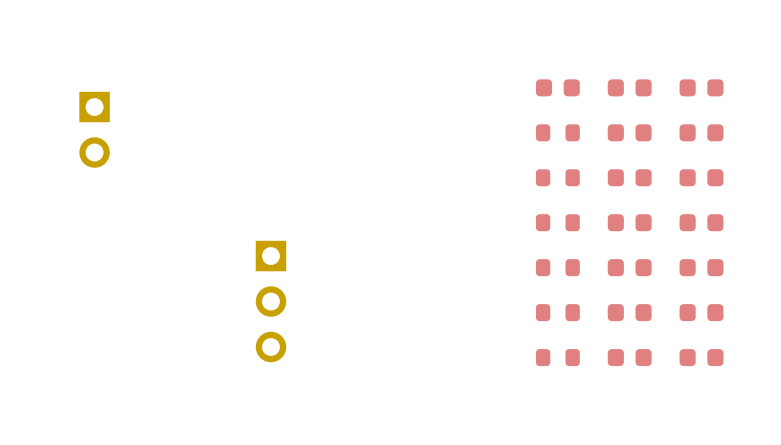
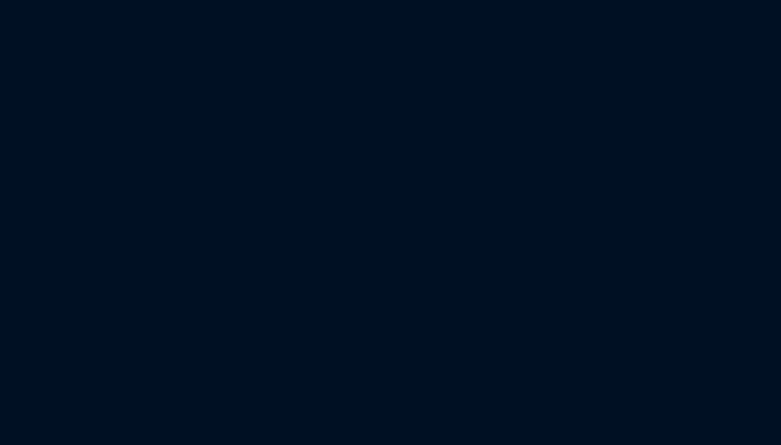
part: (557, 87) -> none
part: (629, 87) -> none
part: (701, 87) -> none
part: (94, 129) -> none
part: (557, 132) -> none
part: (629, 132) -> none
part: (701, 132) -> none
part: (557, 177) -> none
part: (629, 177) -> none
part: (701, 177) -> none
part: (557, 222) -> none
part: (629, 222) -> none
part: (701, 222) -> none
part: (557, 267) -> none
part: (629, 267) -> none
part: (701, 267) -> none
part: (270, 301) -> none
part: (557, 312) -> none
part: (629, 312) -> none
part: (701, 312) -> none
part: (557, 357) -> none
part: (629, 357) -> none
part: (701, 357) -> none

